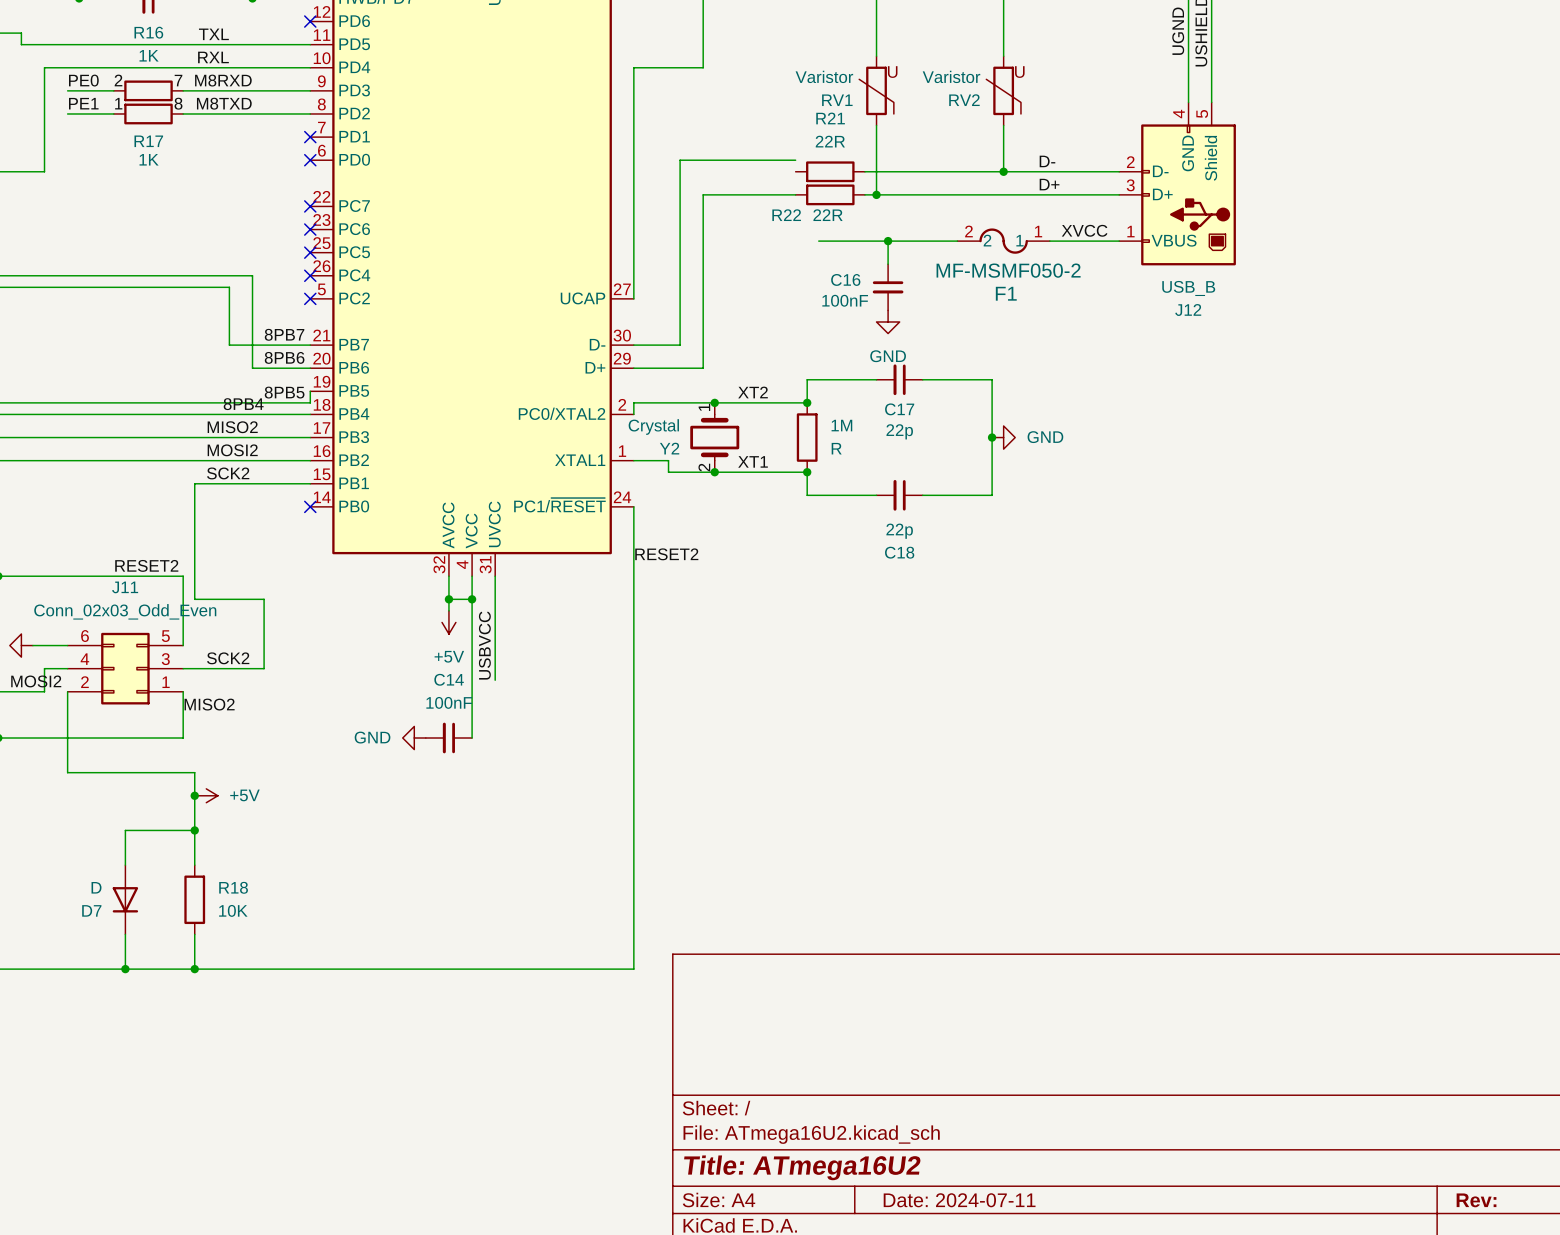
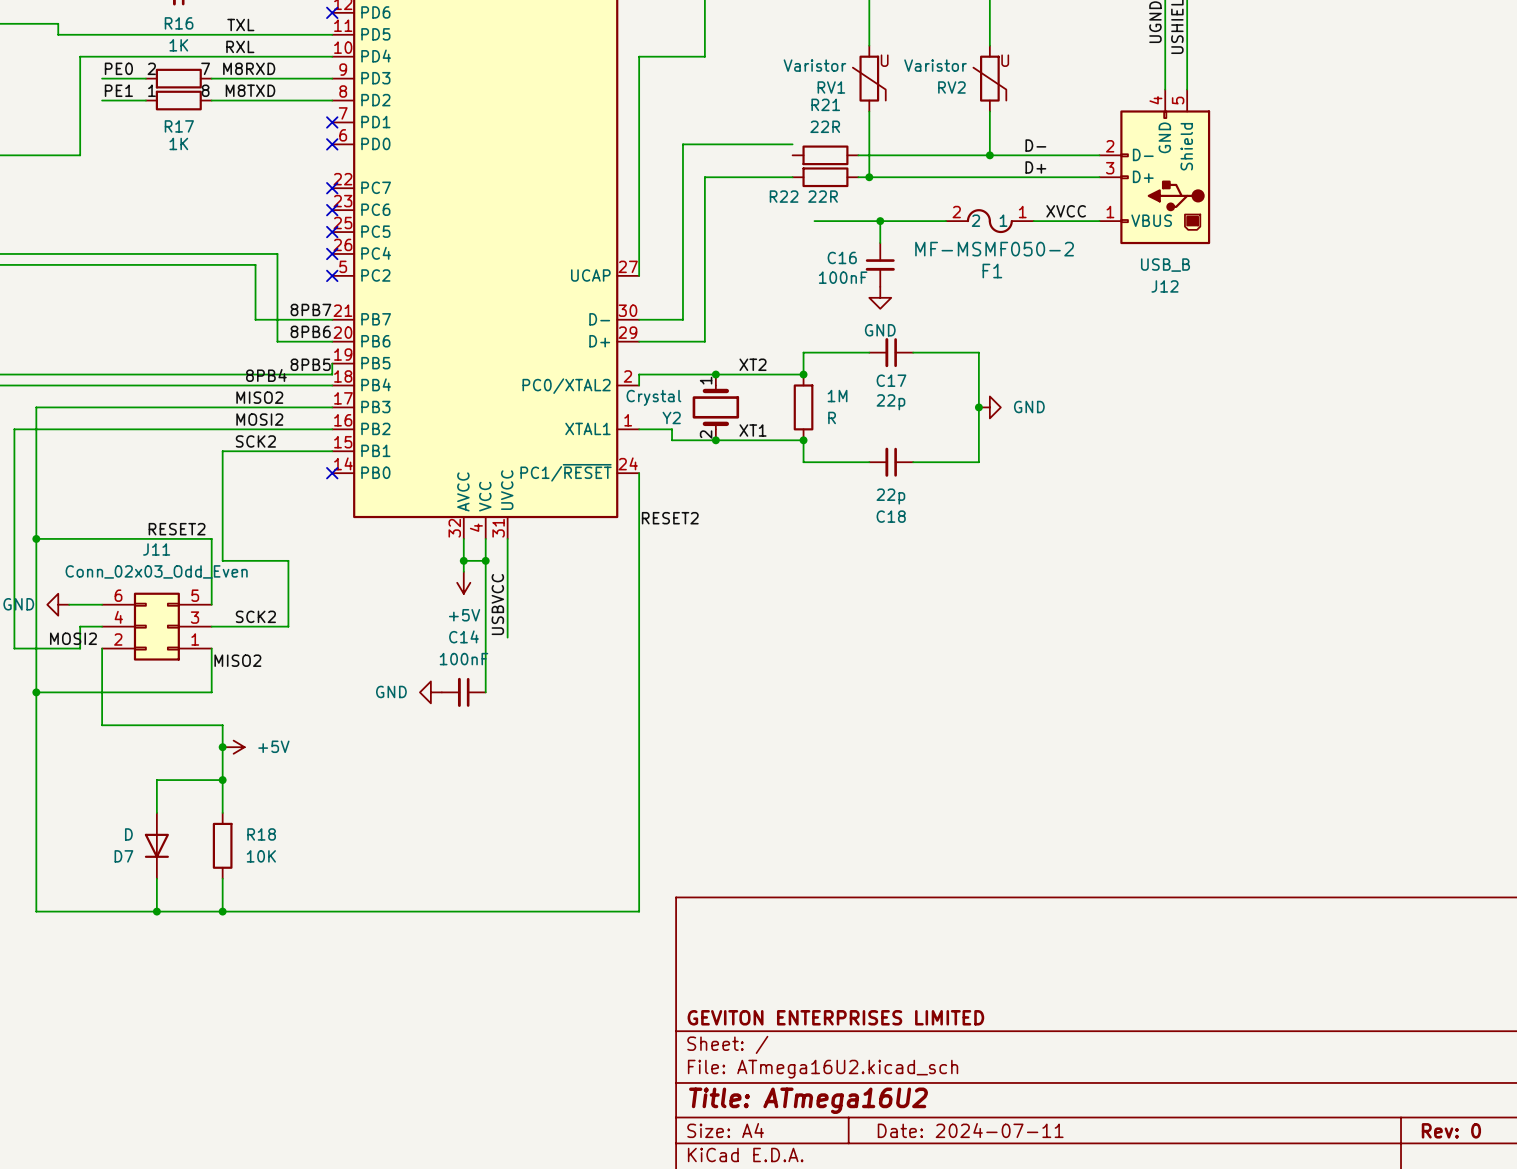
title block: none -> GEVITON ENTERPRISES LIMITED (835, 1017)
title block: Rev: (1476, 1200) -> Rev: 0 (1451, 1130)

